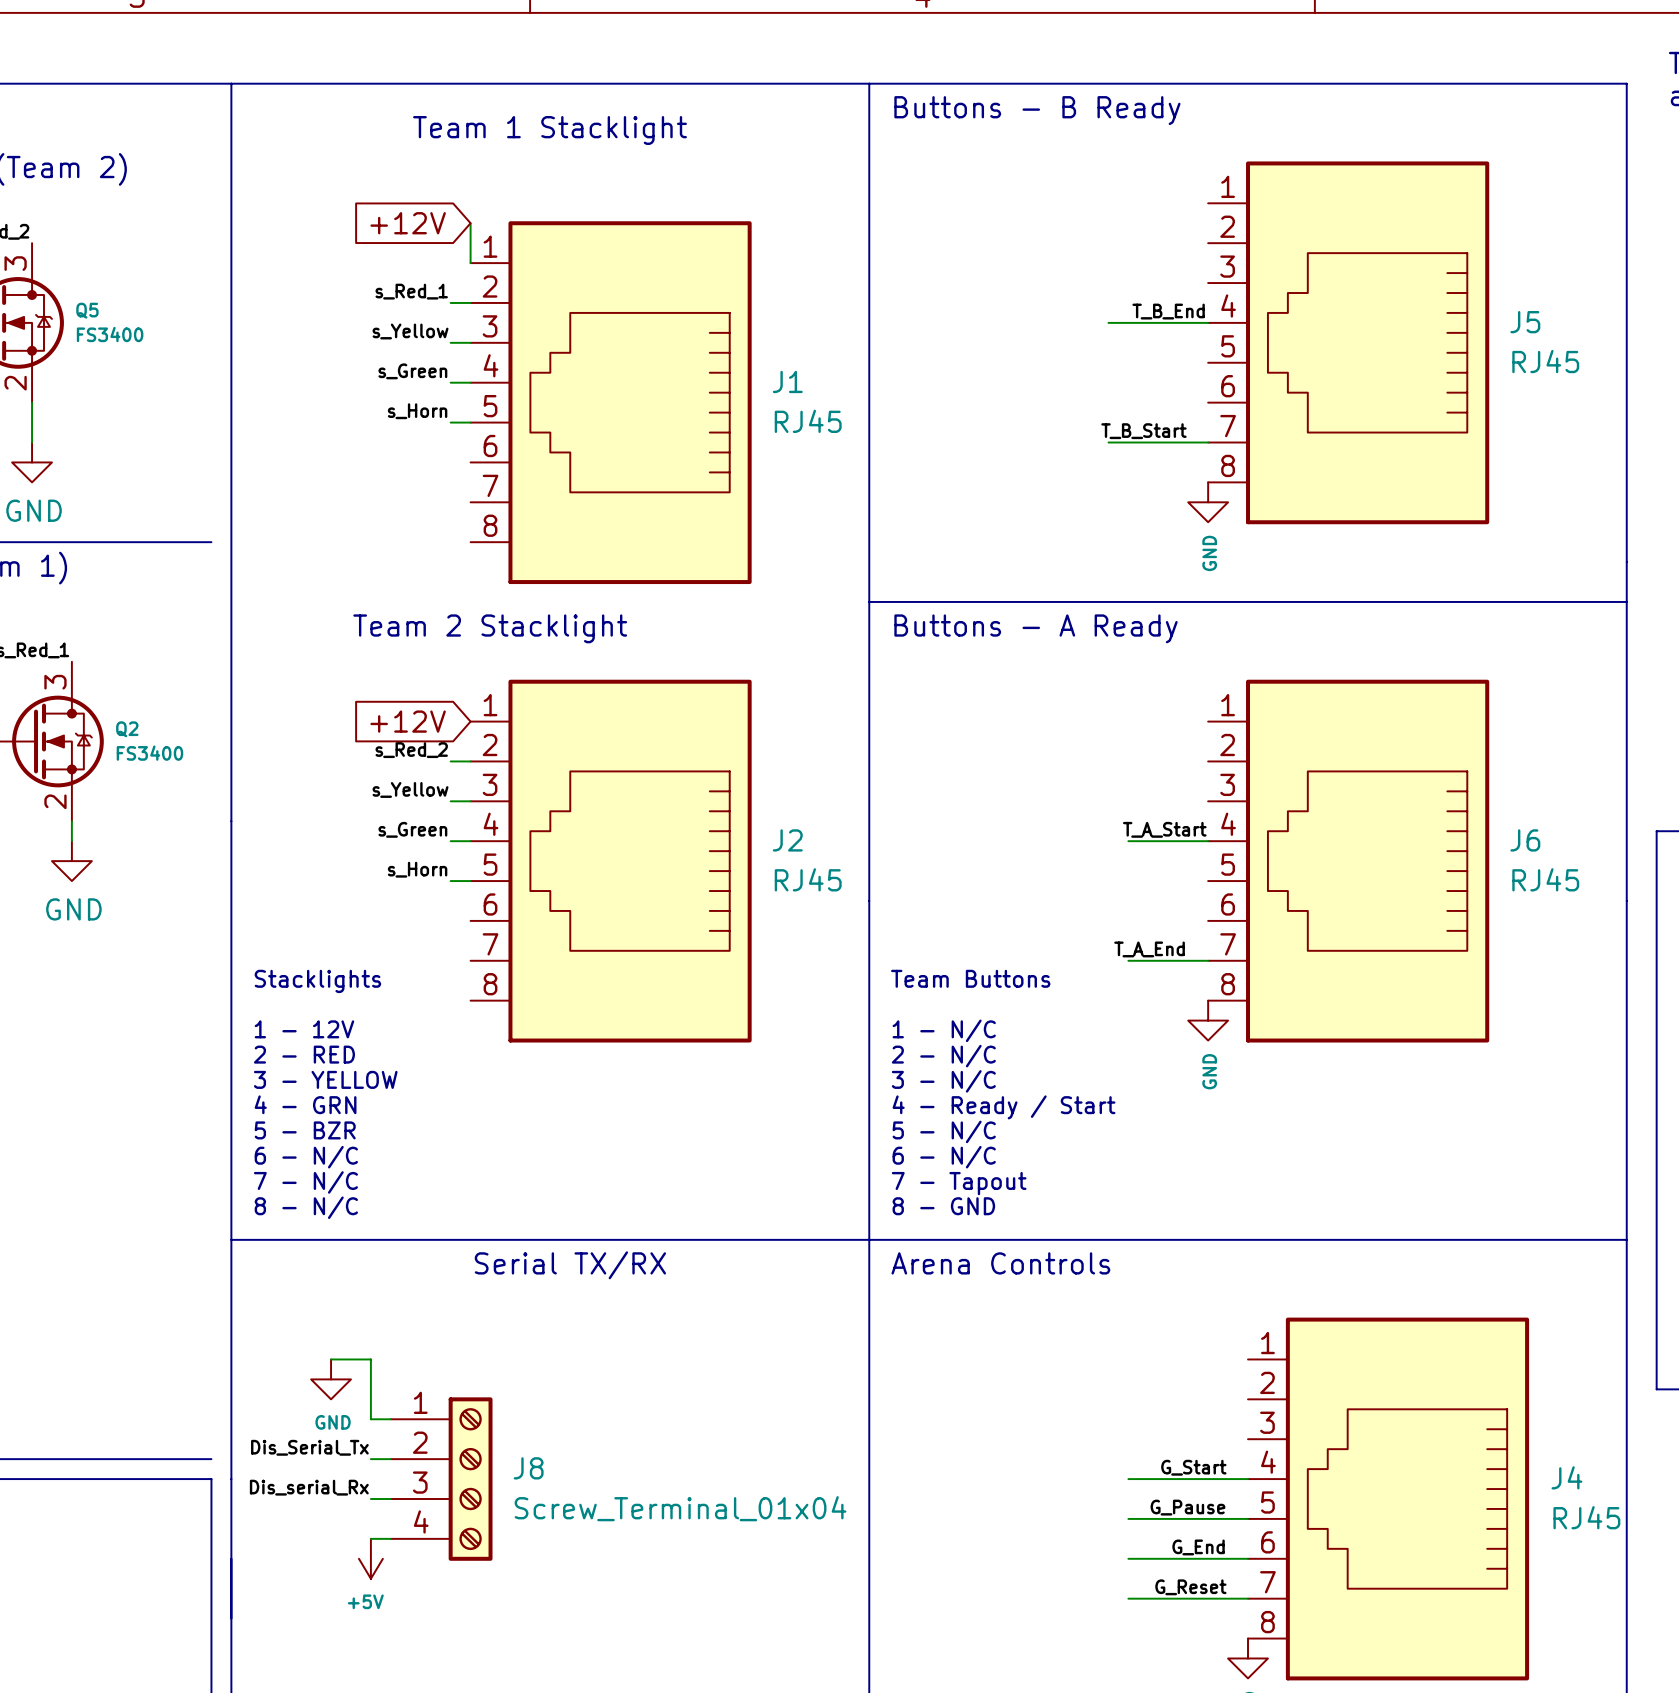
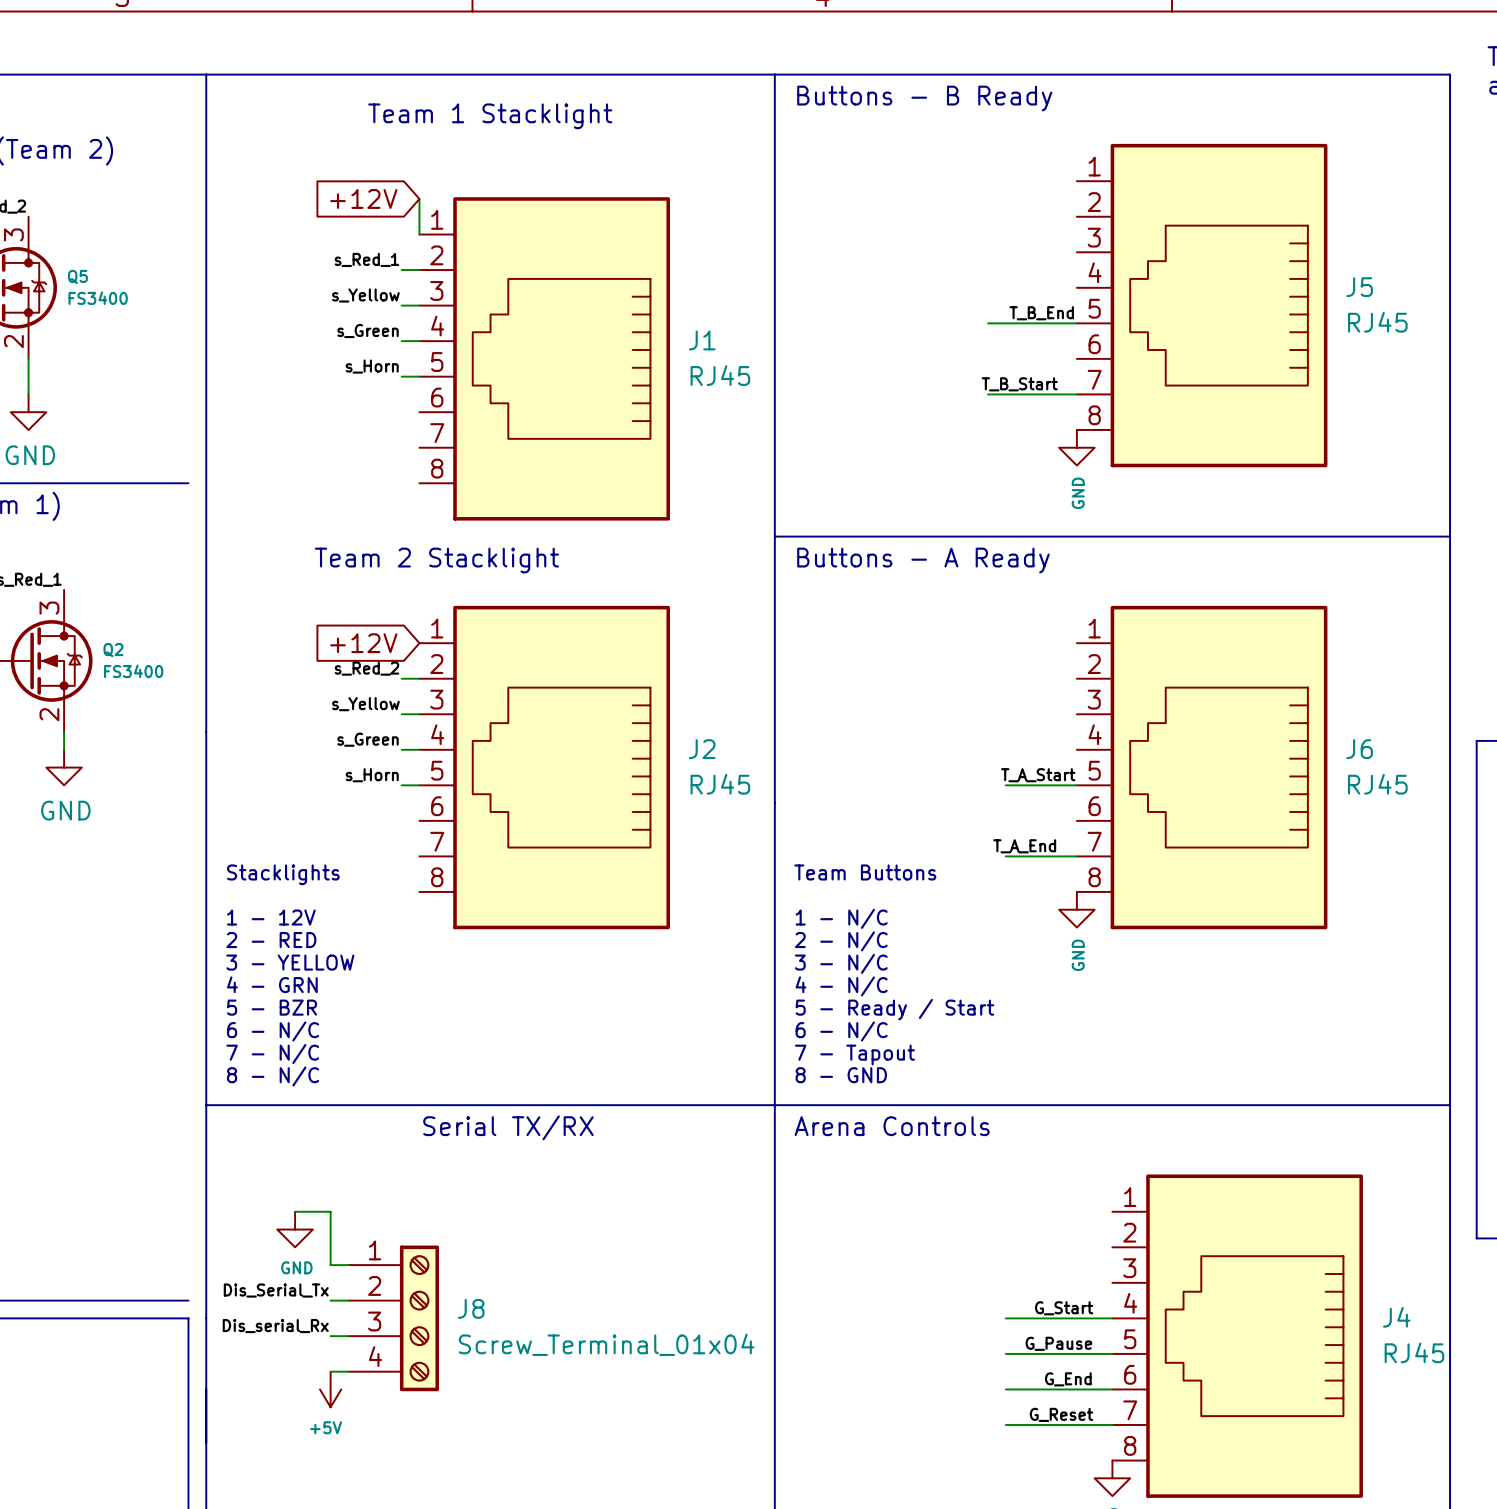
label position: T_B_End (1168, 311) -> T_B_End (1041, 313)
wire: (1108, 322) (1208, 322) -> (988, 323) (1076, 323)
label position: T_A_Start (1164, 829) -> T_A_Start (1038, 775)
wire: (1128, 841) (1208, 841) -> (1005, 785) (1076, 785)
text: 4 - Ready / Start (1004, 1107) -> 4 - N/C (841, 986)
text: 5 - N/C (944, 1131) -> 5 - Ready / Start (894, 1009)

